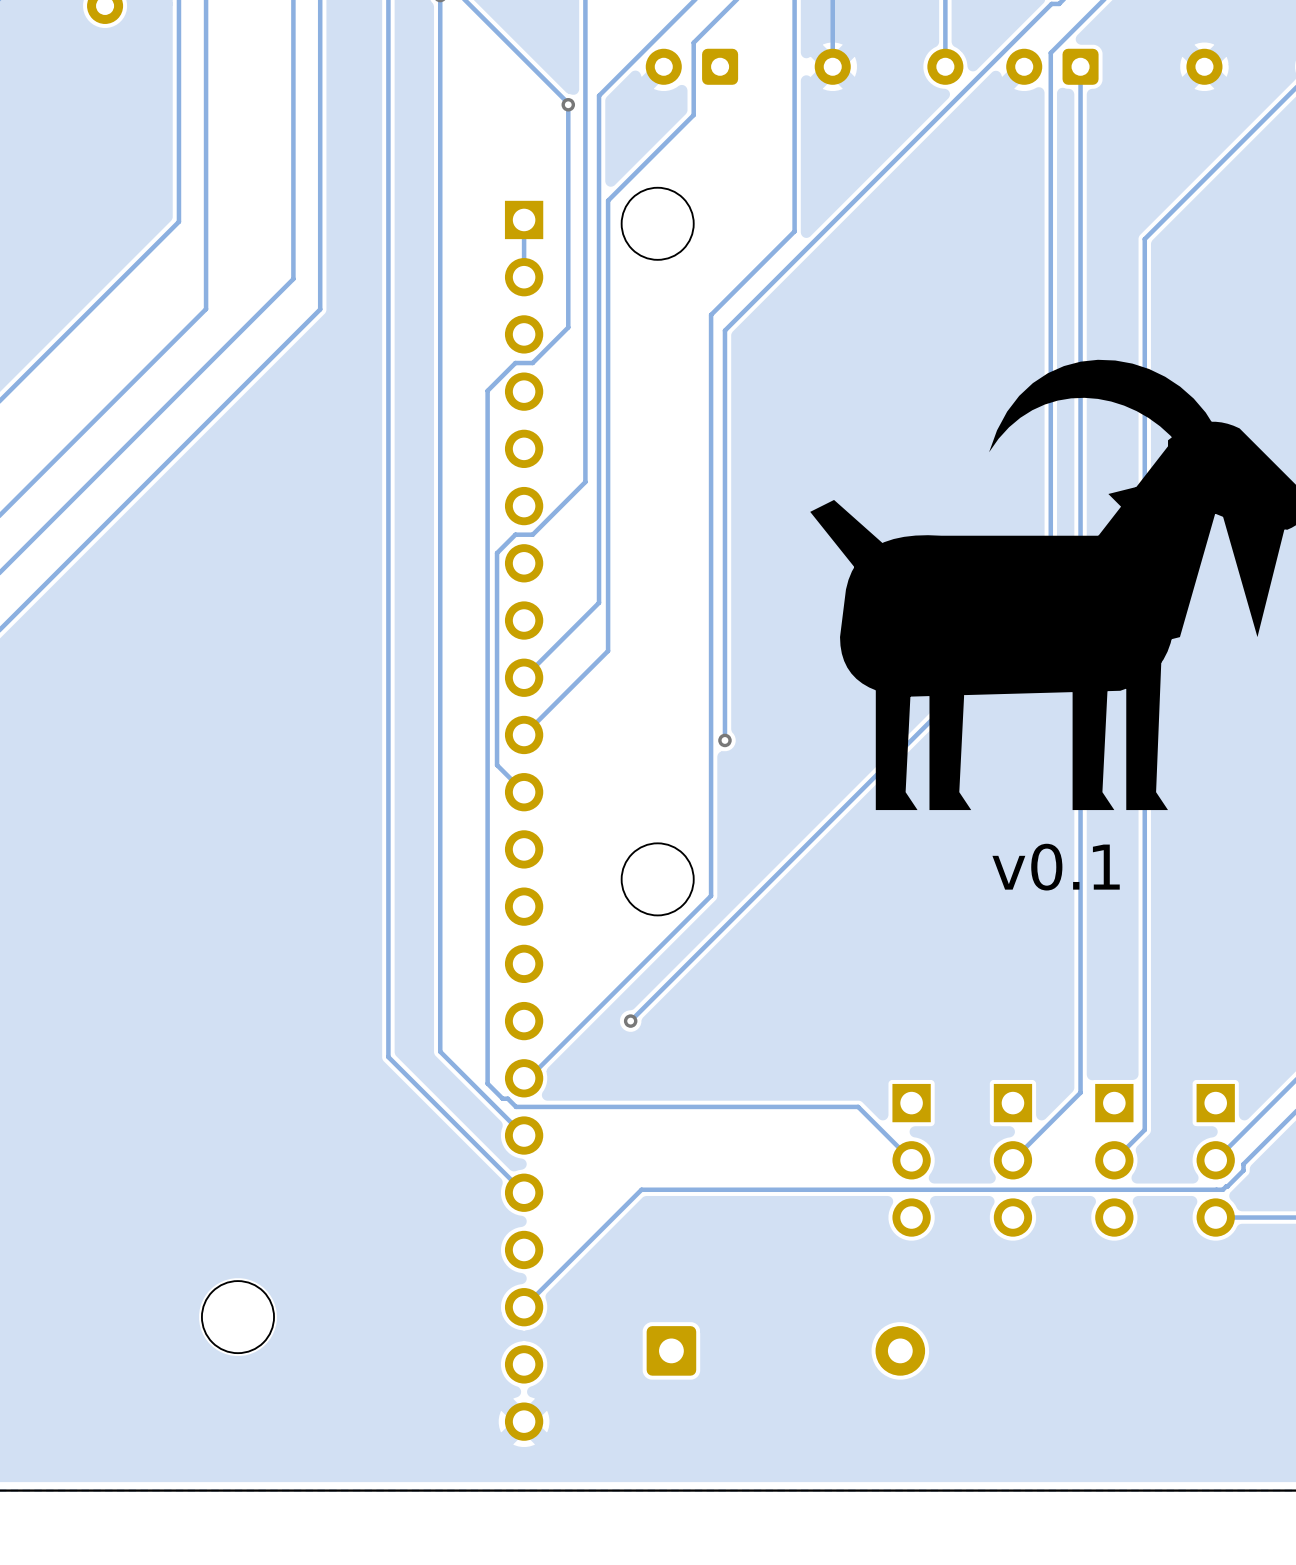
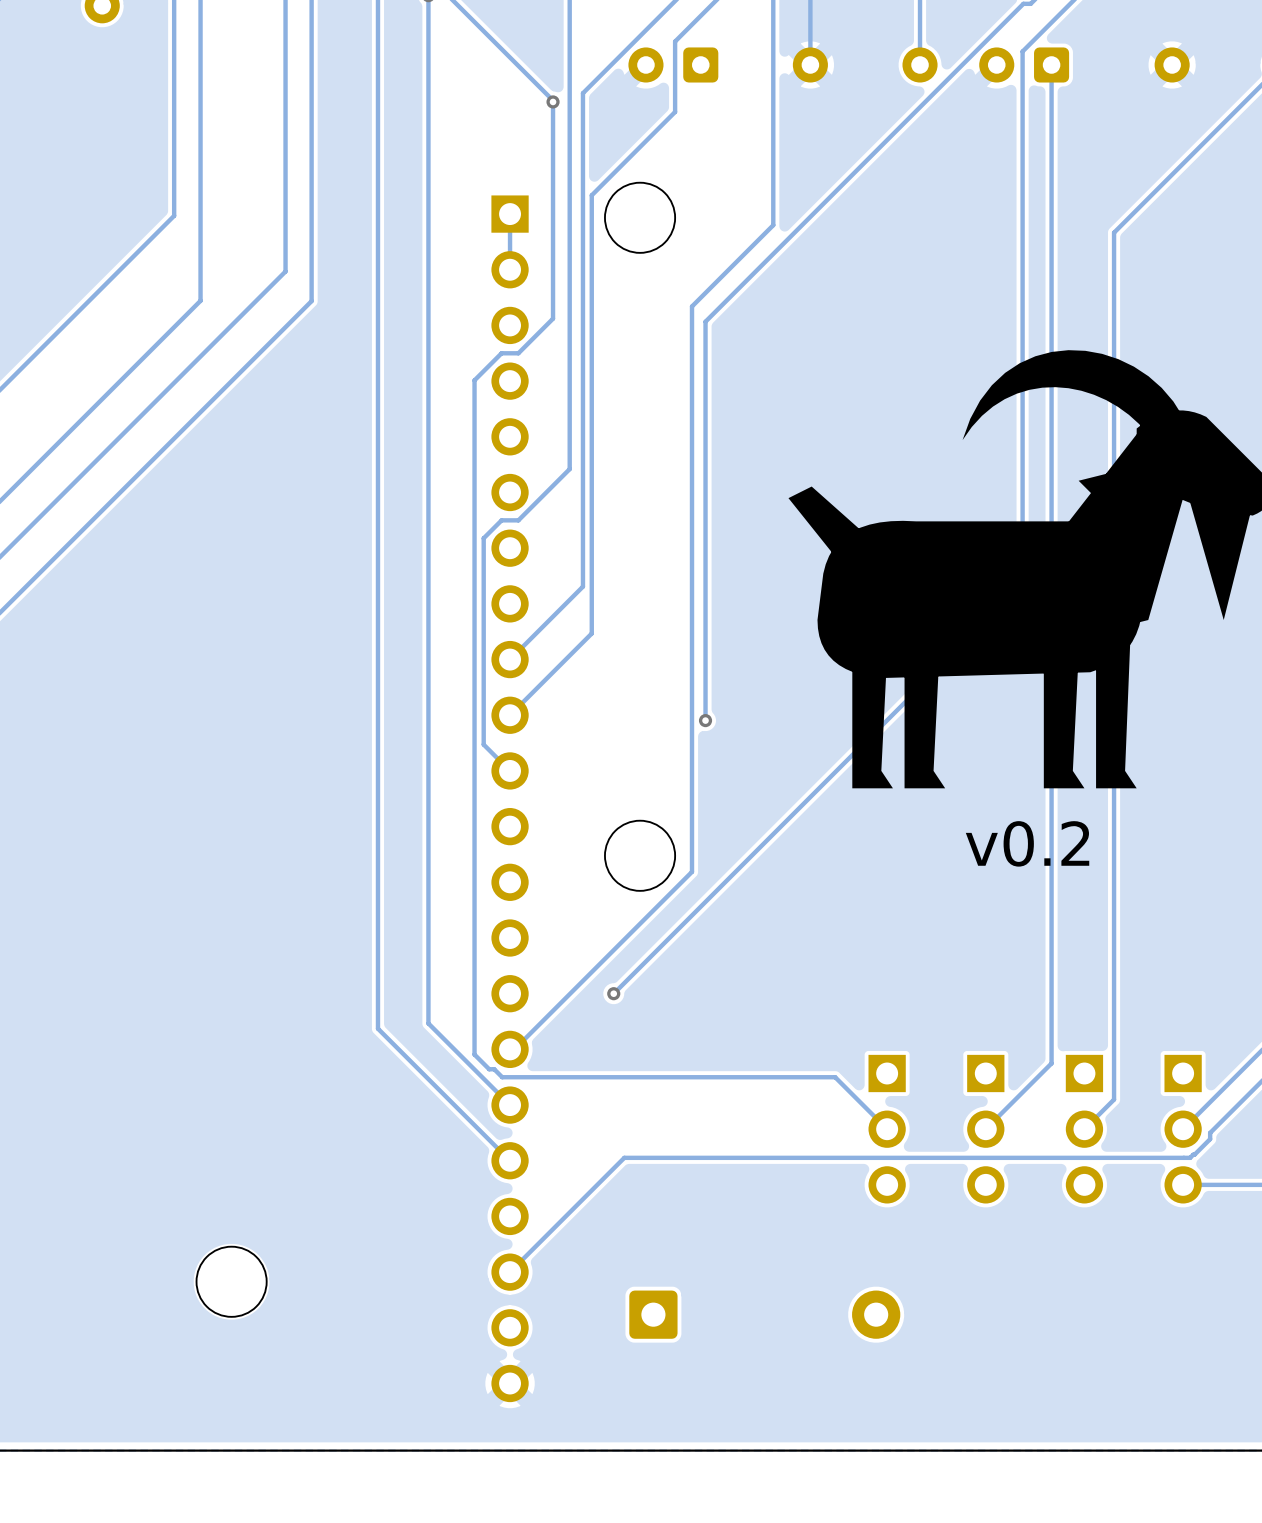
text: v0.1 (1056, 867) -> v0.2 (1027, 843)

